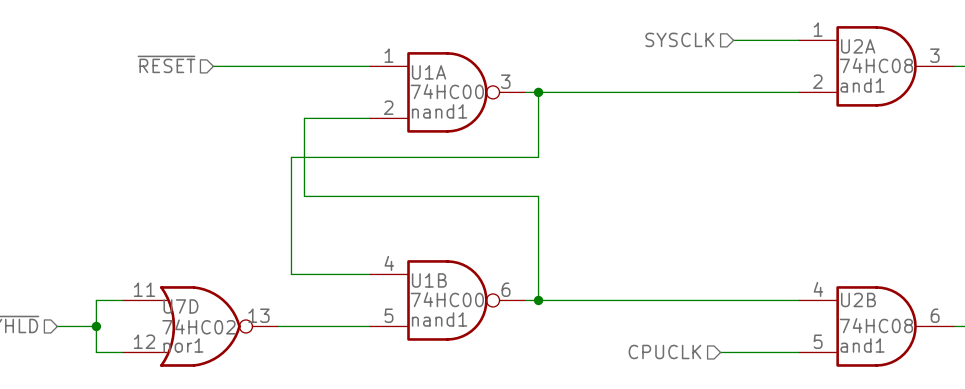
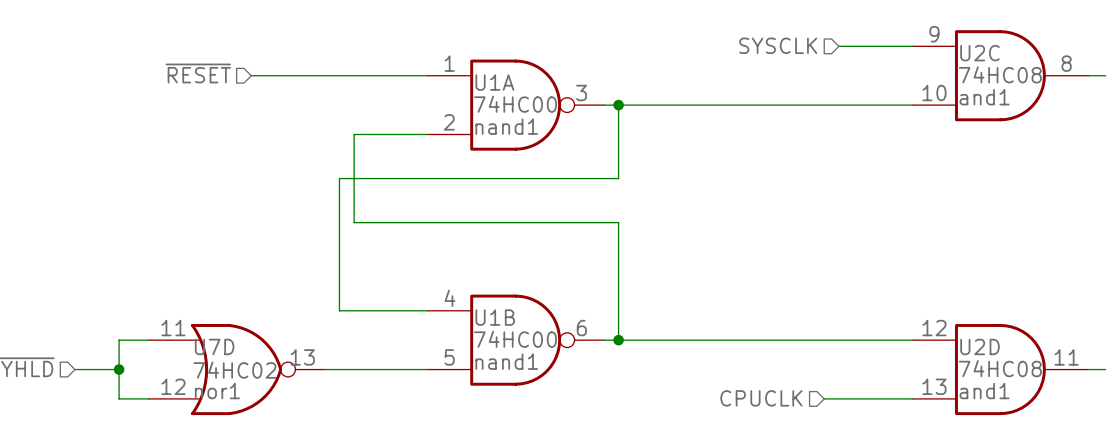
U2A pin number: 1 (818, 29) -> 9 (934, 34)
U2A name: U2A (858, 46) -> U2C (980, 53)
U2A pin number: 3 (934, 55) -> 8 (1066, 63)
U2A pin number: 2 (817, 81) -> 10 (934, 92)
U2B pin number: 4 (818, 289) -> 12 (934, 328)
U2B name: U2B (858, 299) -> U2D (980, 346)
U2B pin number: 6 (935, 315) -> 11 (1066, 357)
U2B pin number: 5 (818, 341) -> 13 (934, 386)

